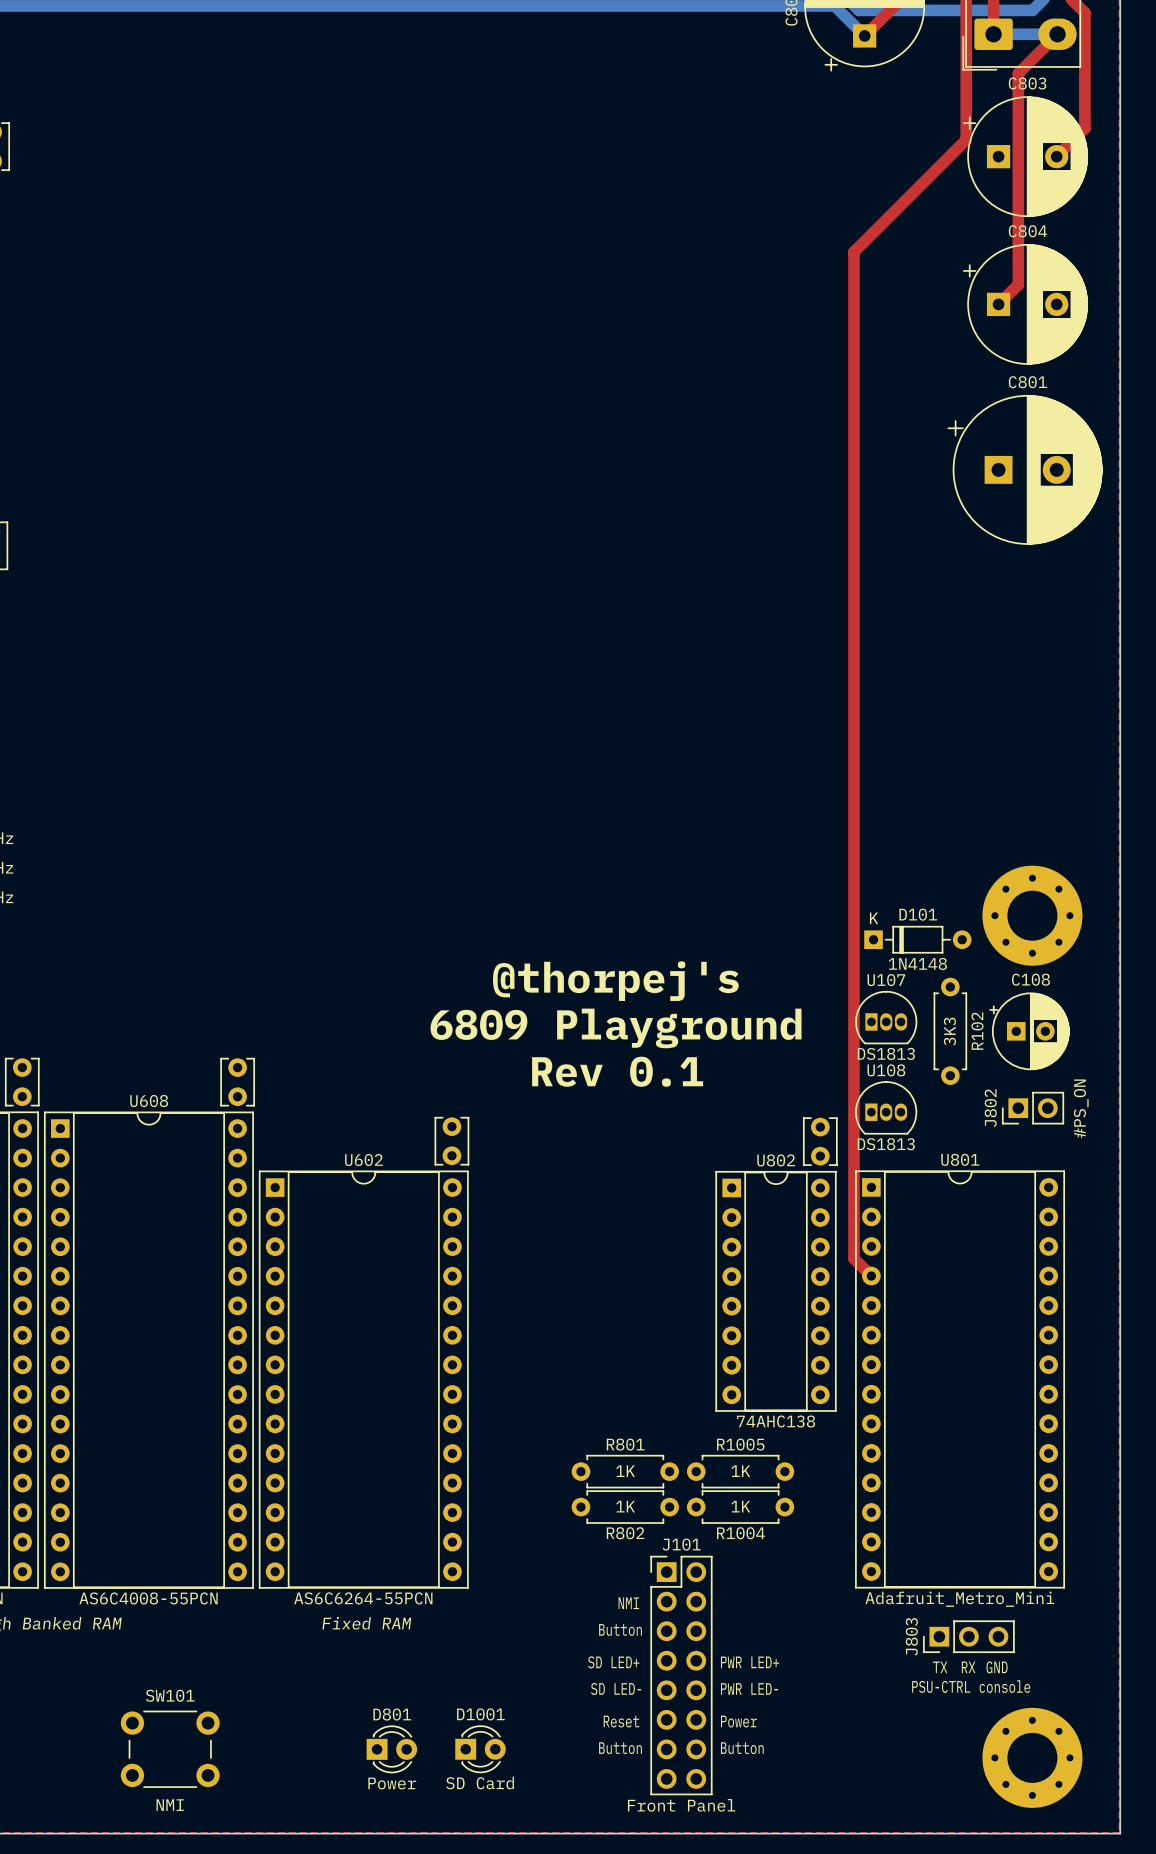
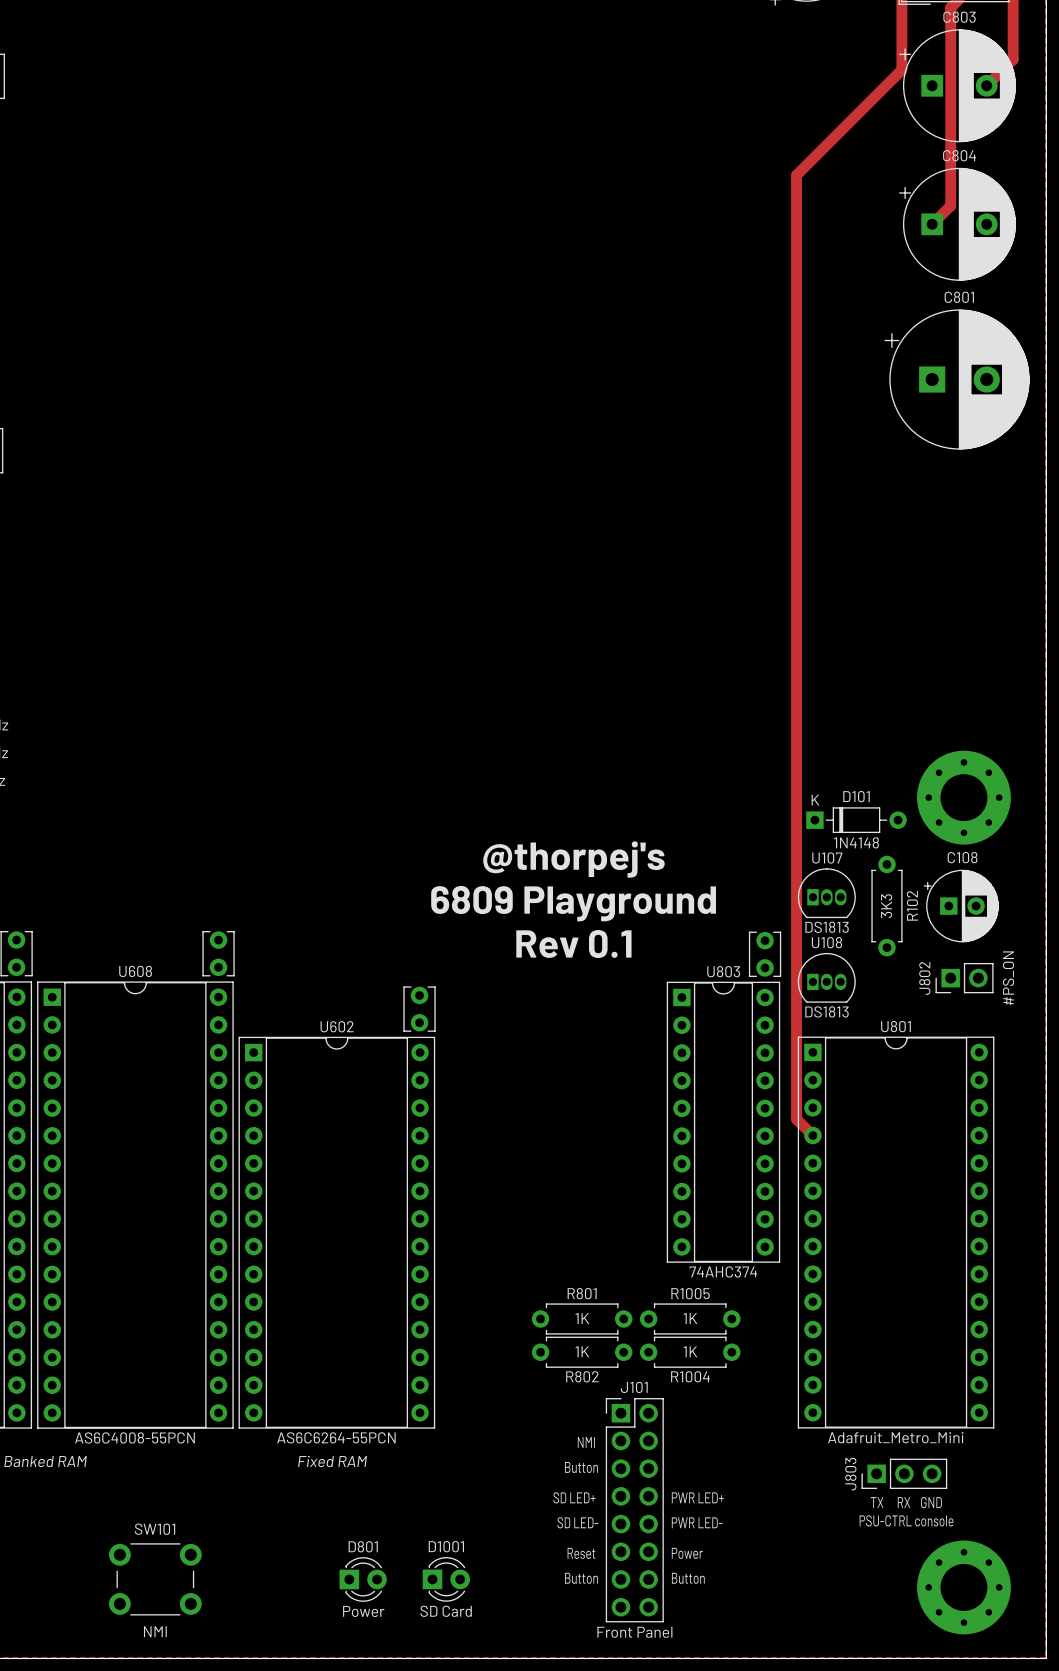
part position: (820, 1141) -> (765, 954)
U803: none -> 74AHC374 (723, 1122)
U802: 74AHC138 (776, 1291) -> none

